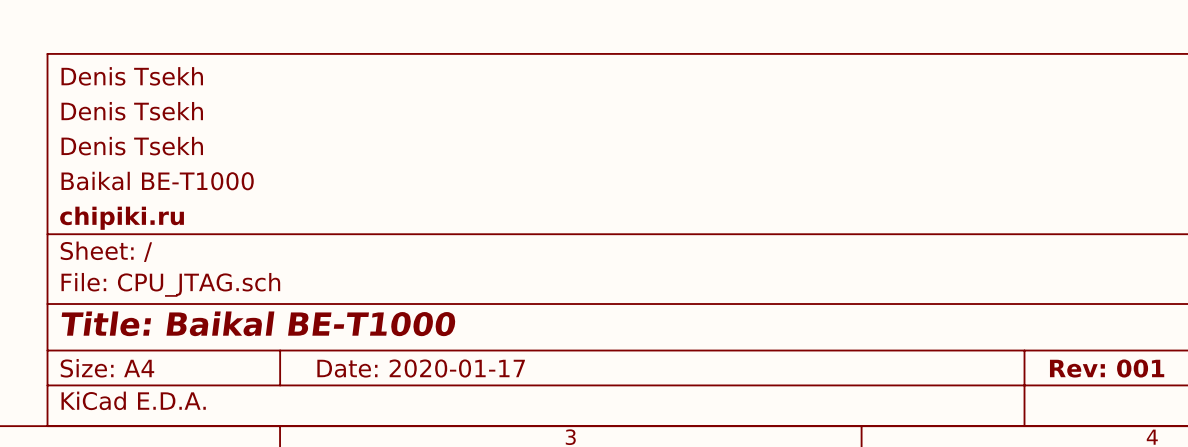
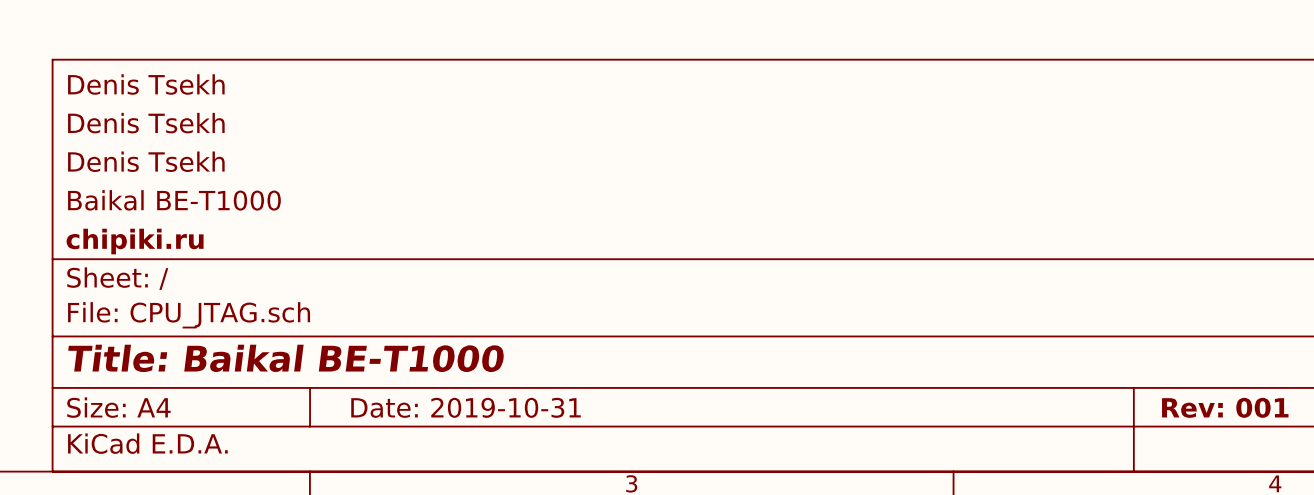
title block: Date: 2020-01-17 (421, 368) -> Date: 2019-10-31 (466, 407)

